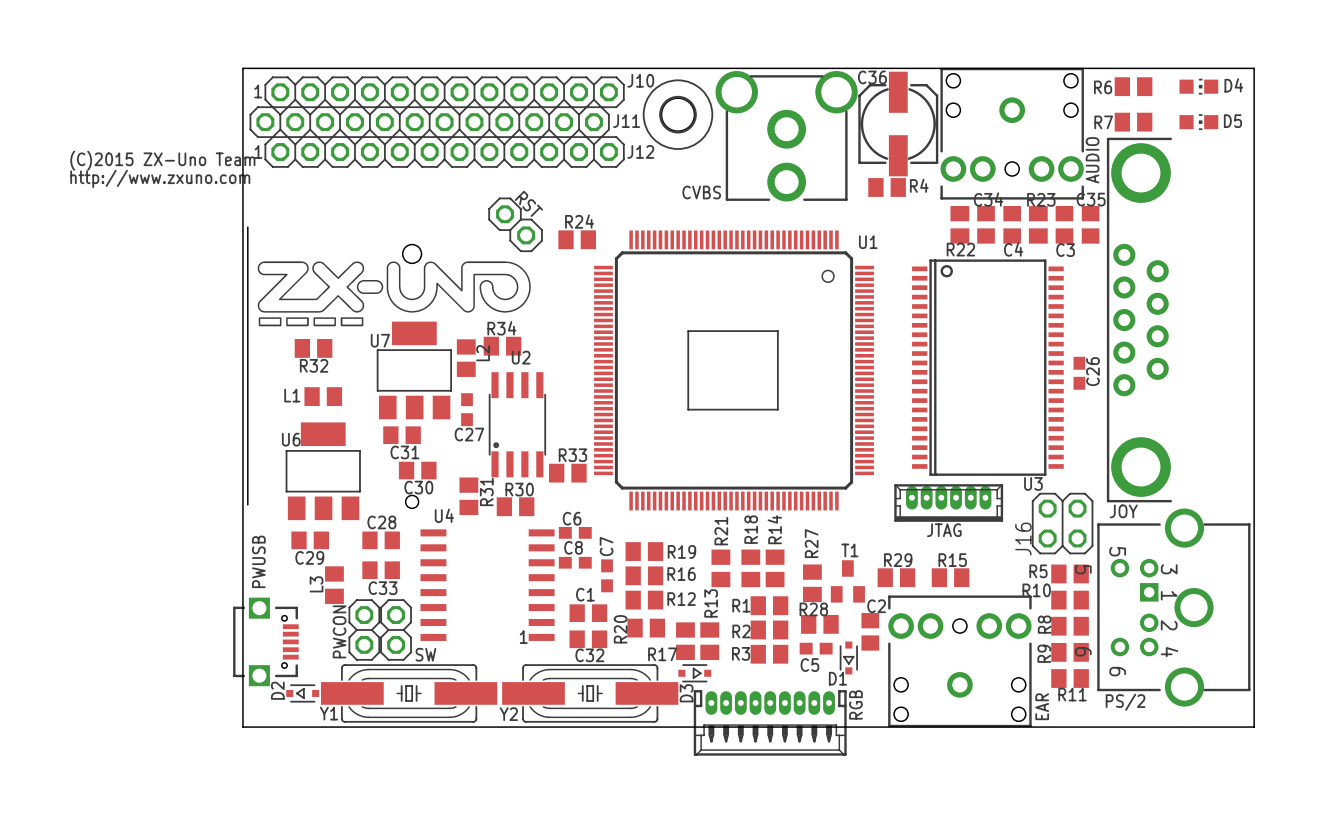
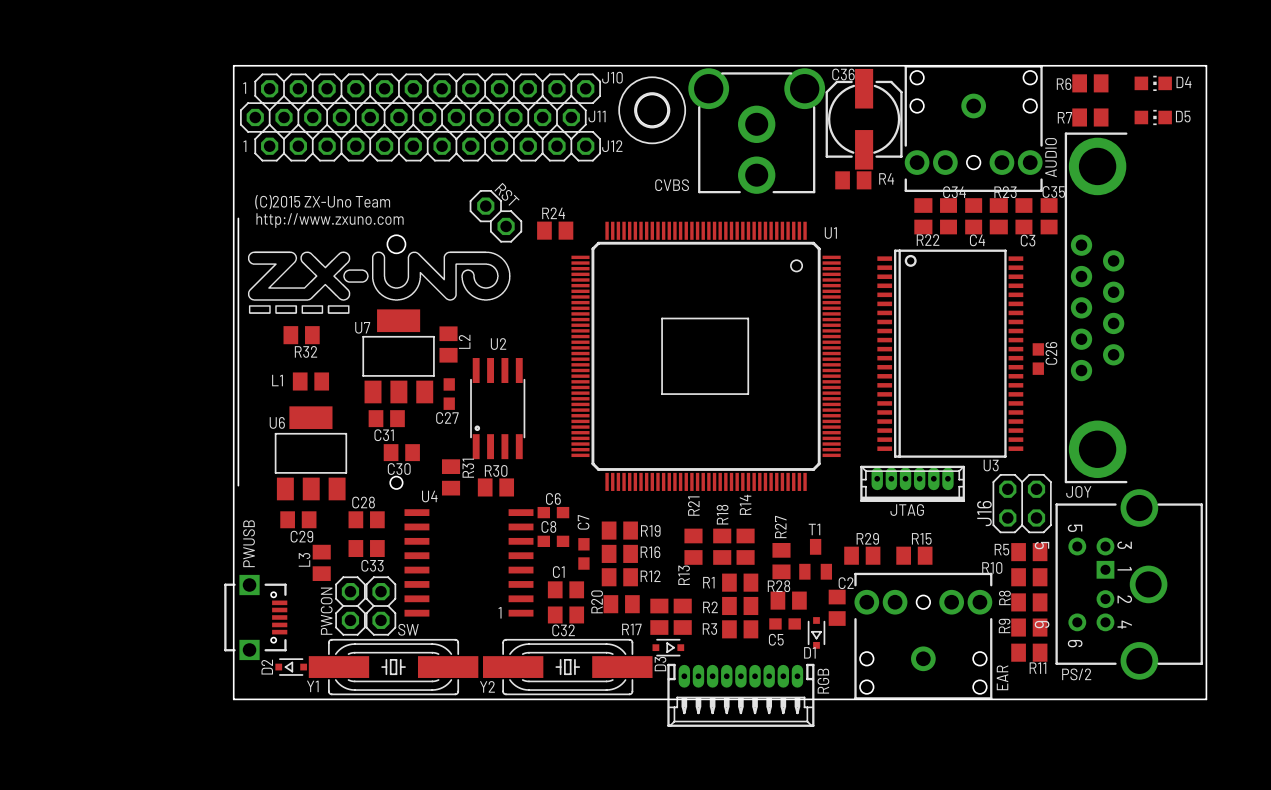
text position: (C)2015 ZX-Uno Team (162, 160) -> (C)2015 ZX-Uno Team (322, 202)
text position: http://www.zxuno.com (160, 178) -> http://www.zxuno.com (330, 220)
R34: (502, 346) -> none
R33: (567, 473) -> none

